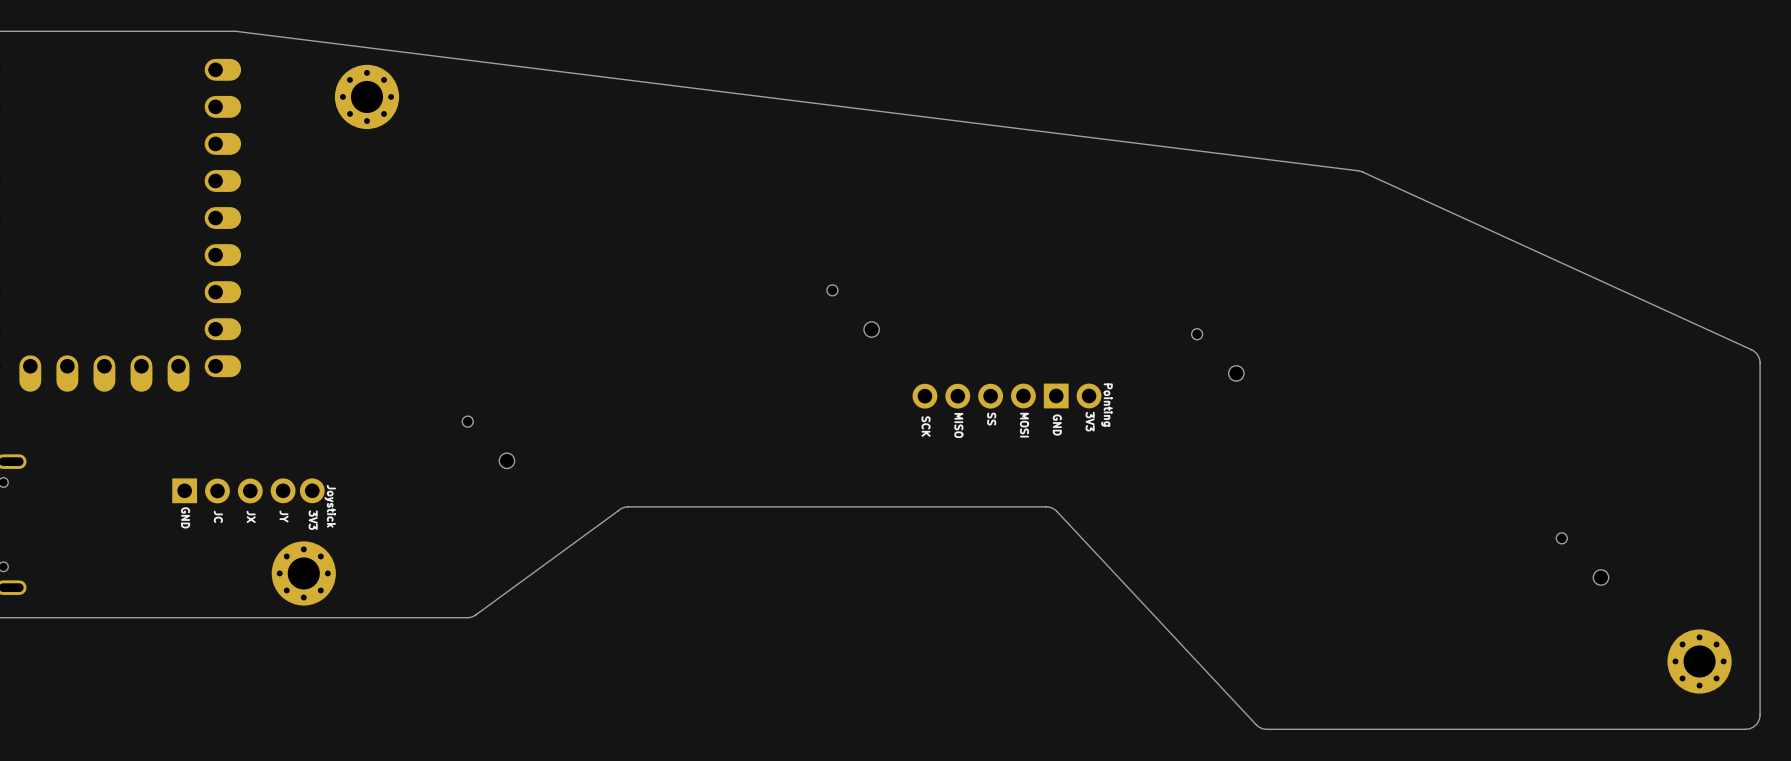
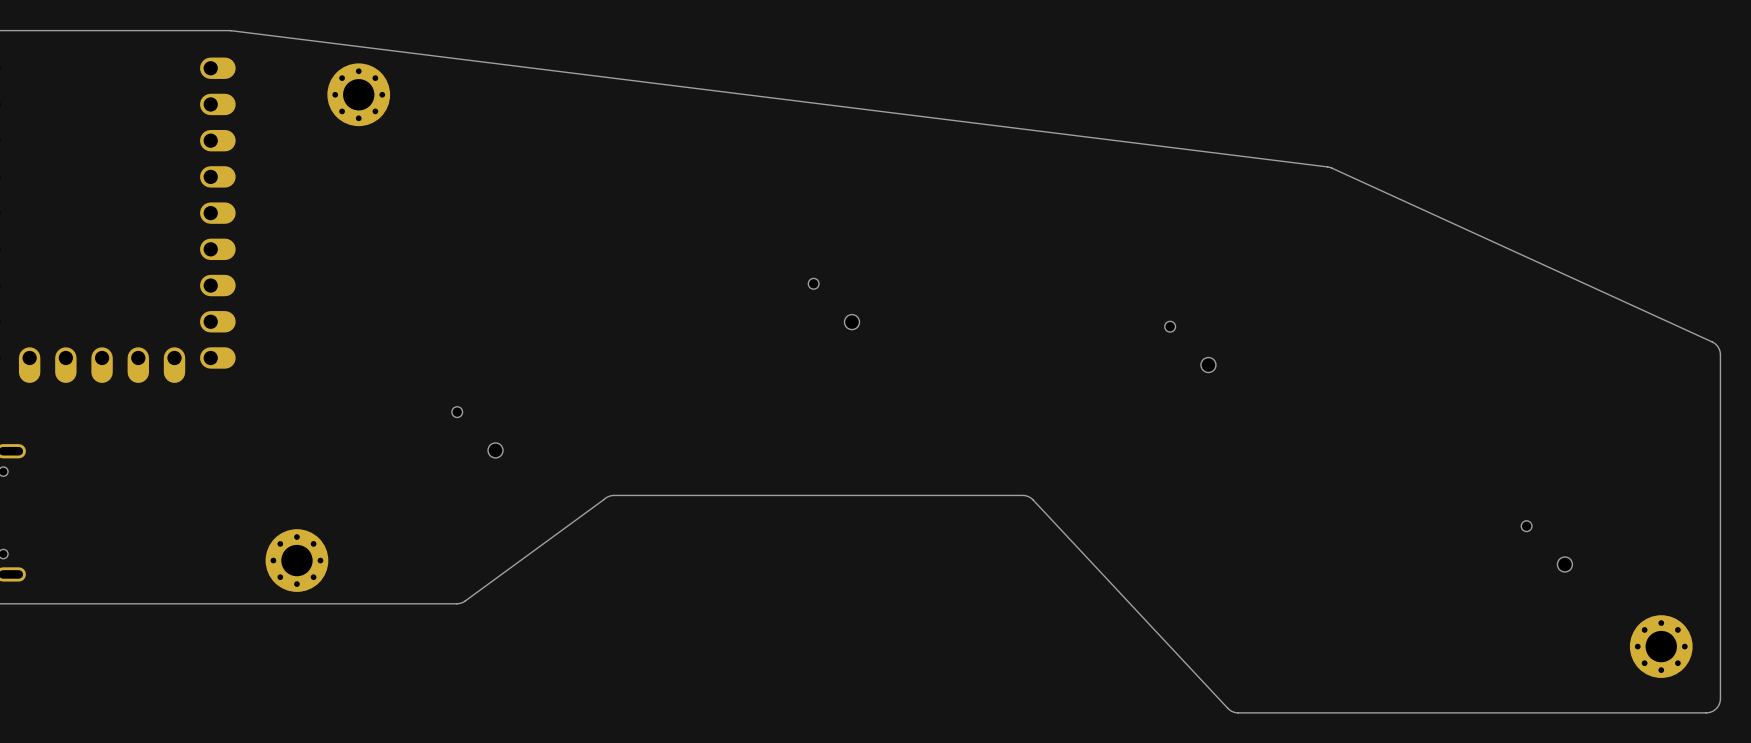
part: (1007, 396) -> none
part: (248, 490) -> none

